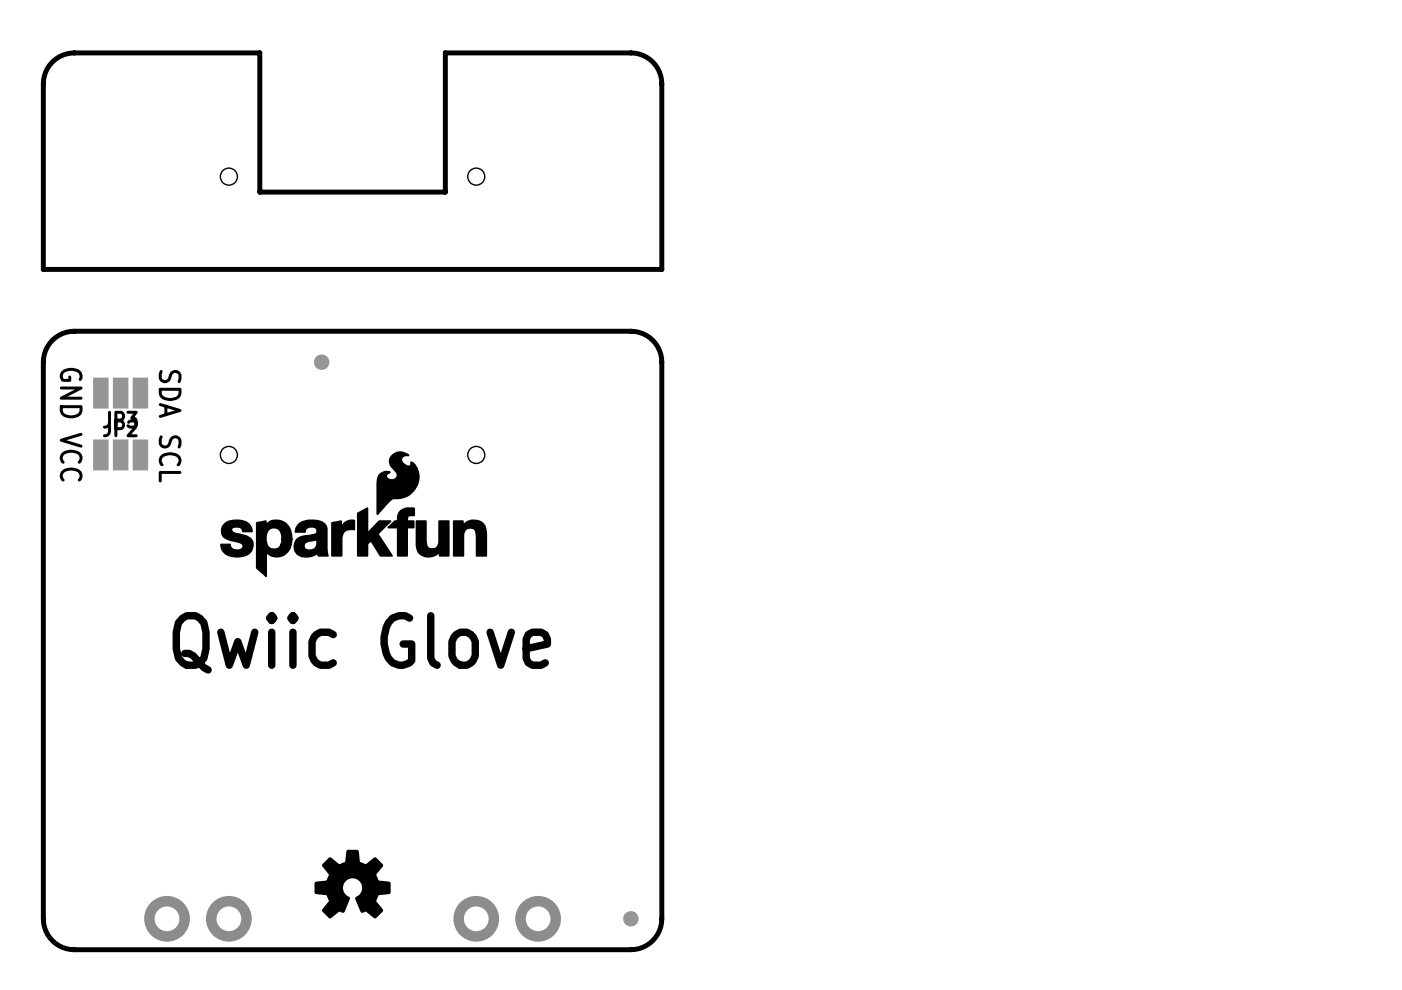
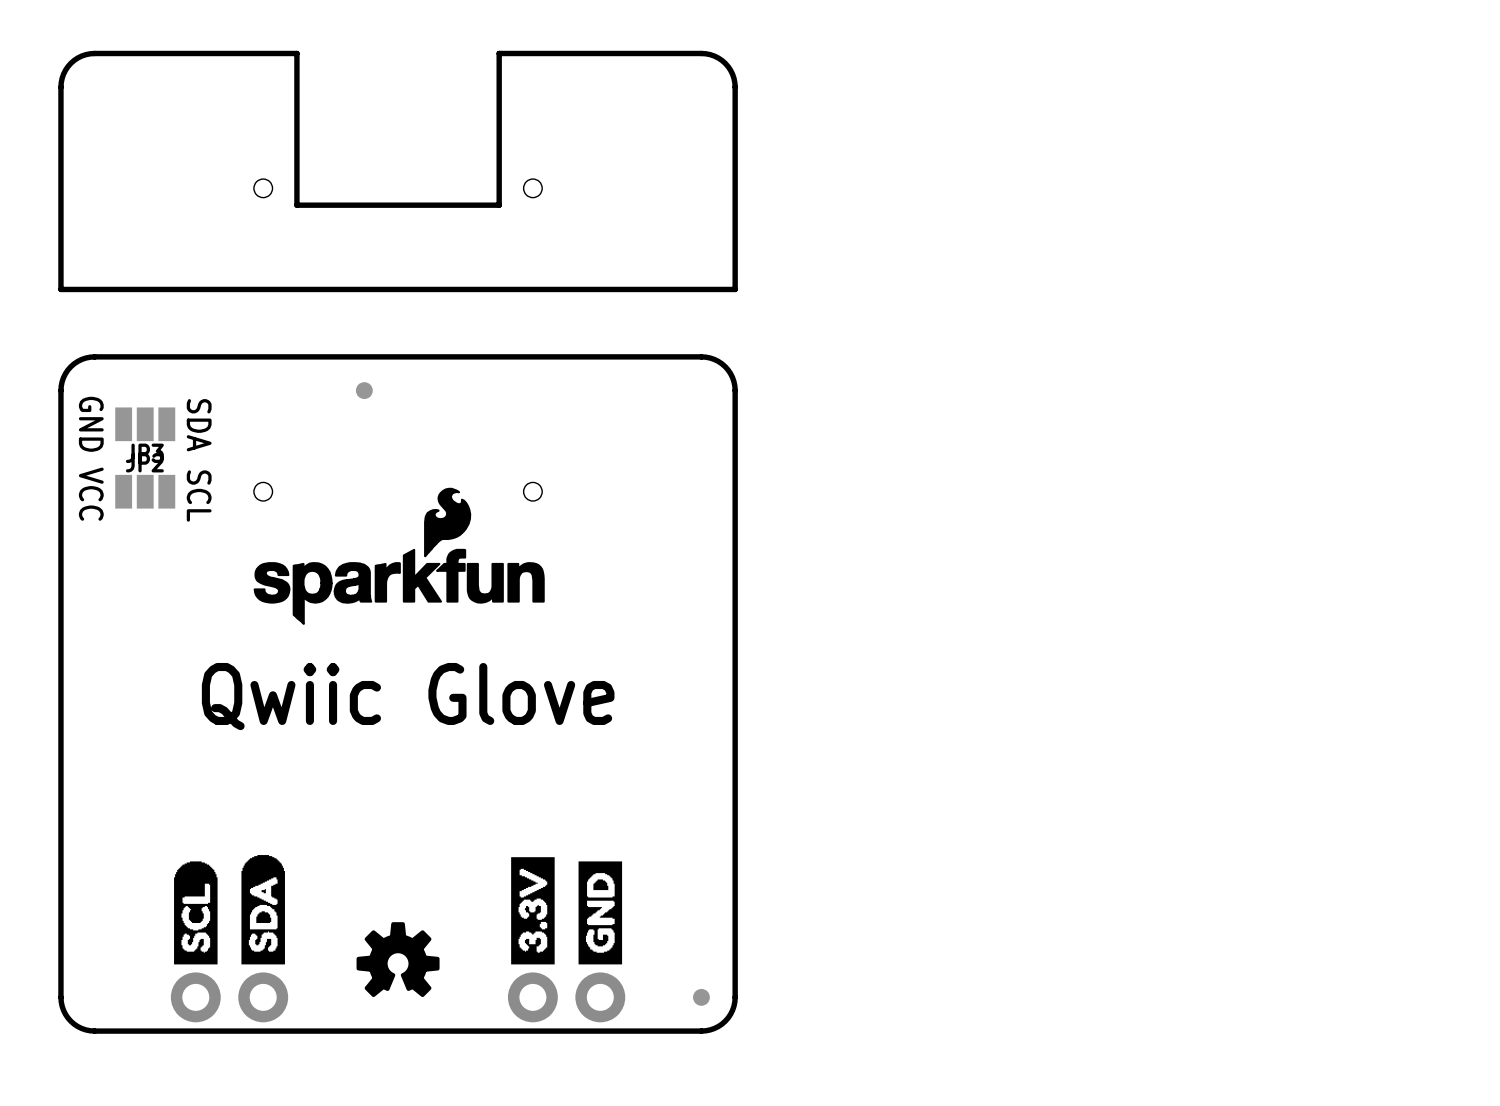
drawing: none -> [174, 855, 285, 965]
drawing: none -> [511, 857, 623, 965]

